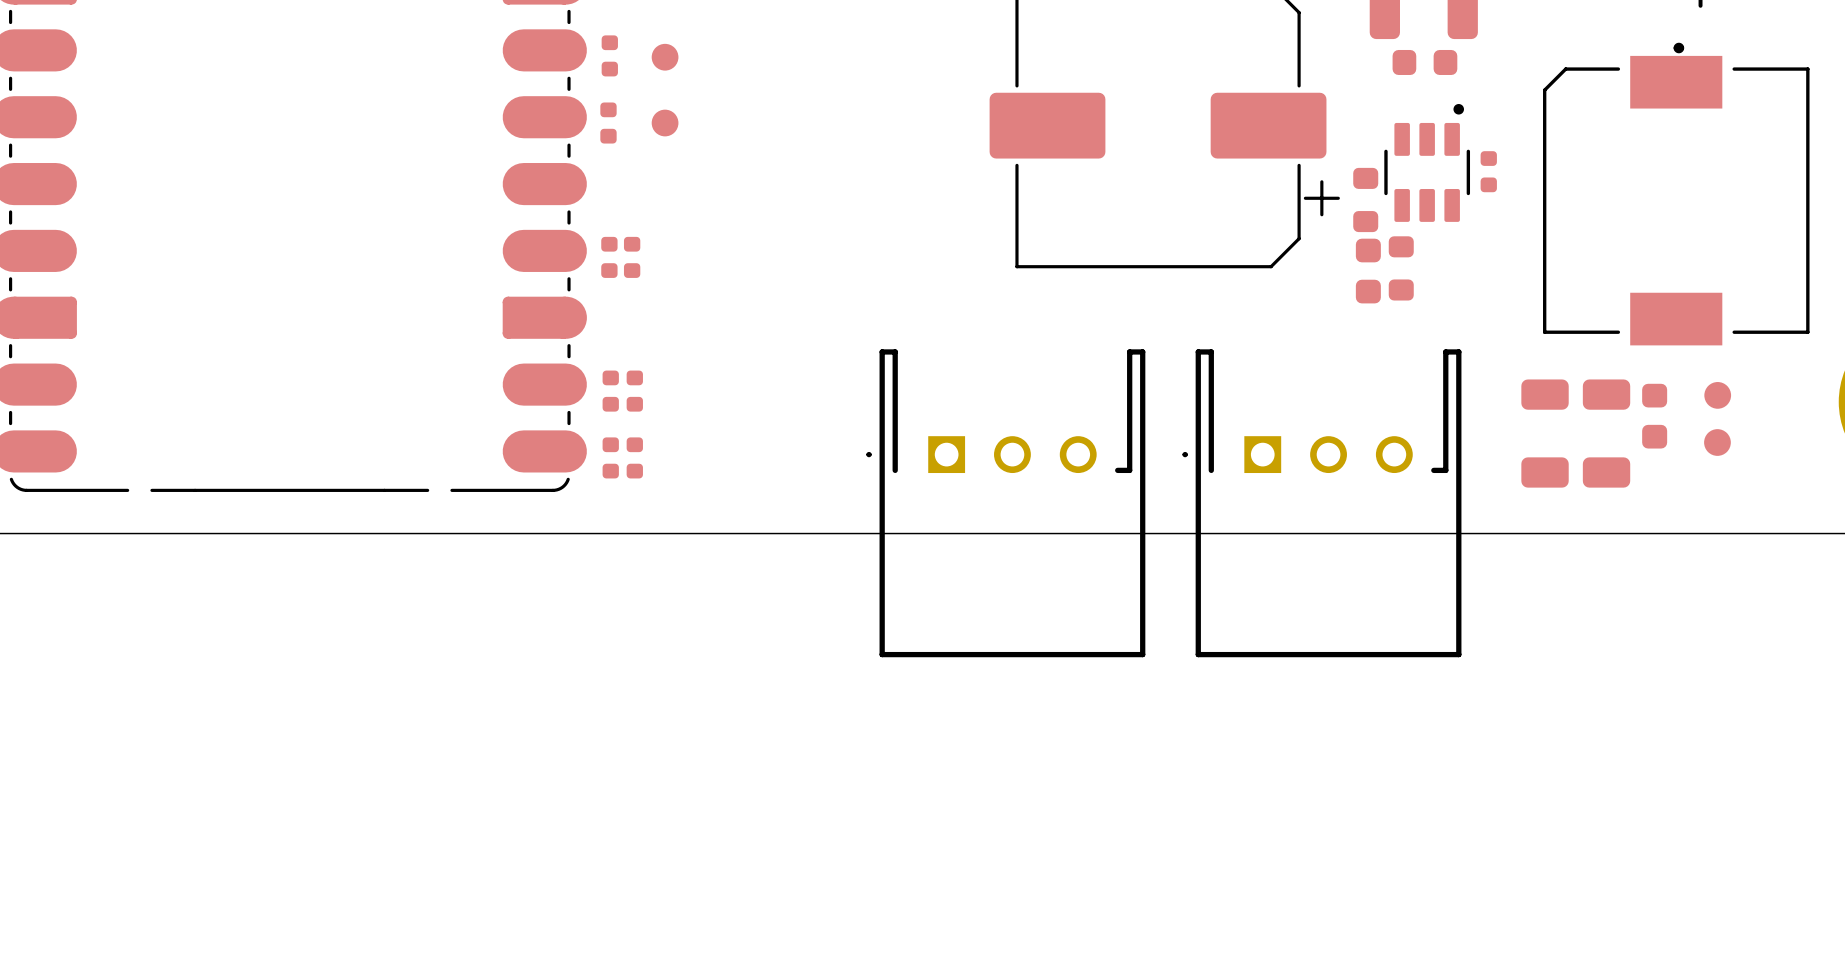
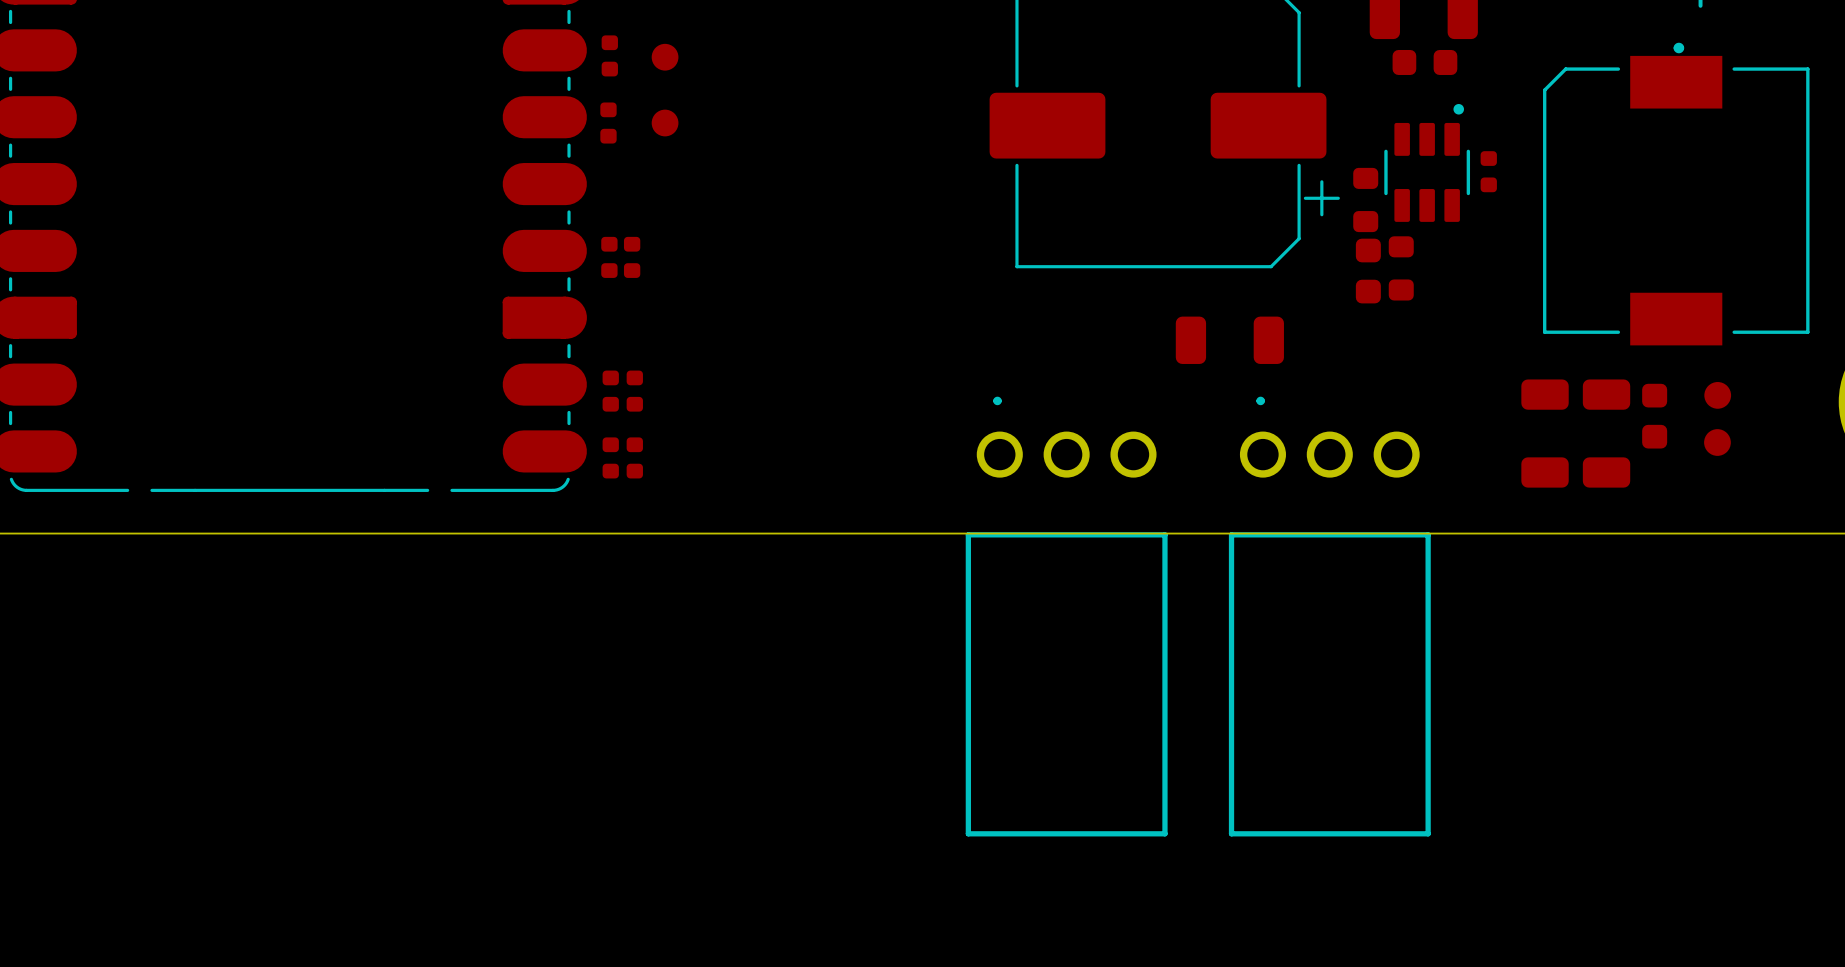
part: none -> (1229, 340)
part: (1005, 503) -> none
part: (1321, 503) -> none
part: none -> (1066, 616)
part: none -> (1329, 616)

